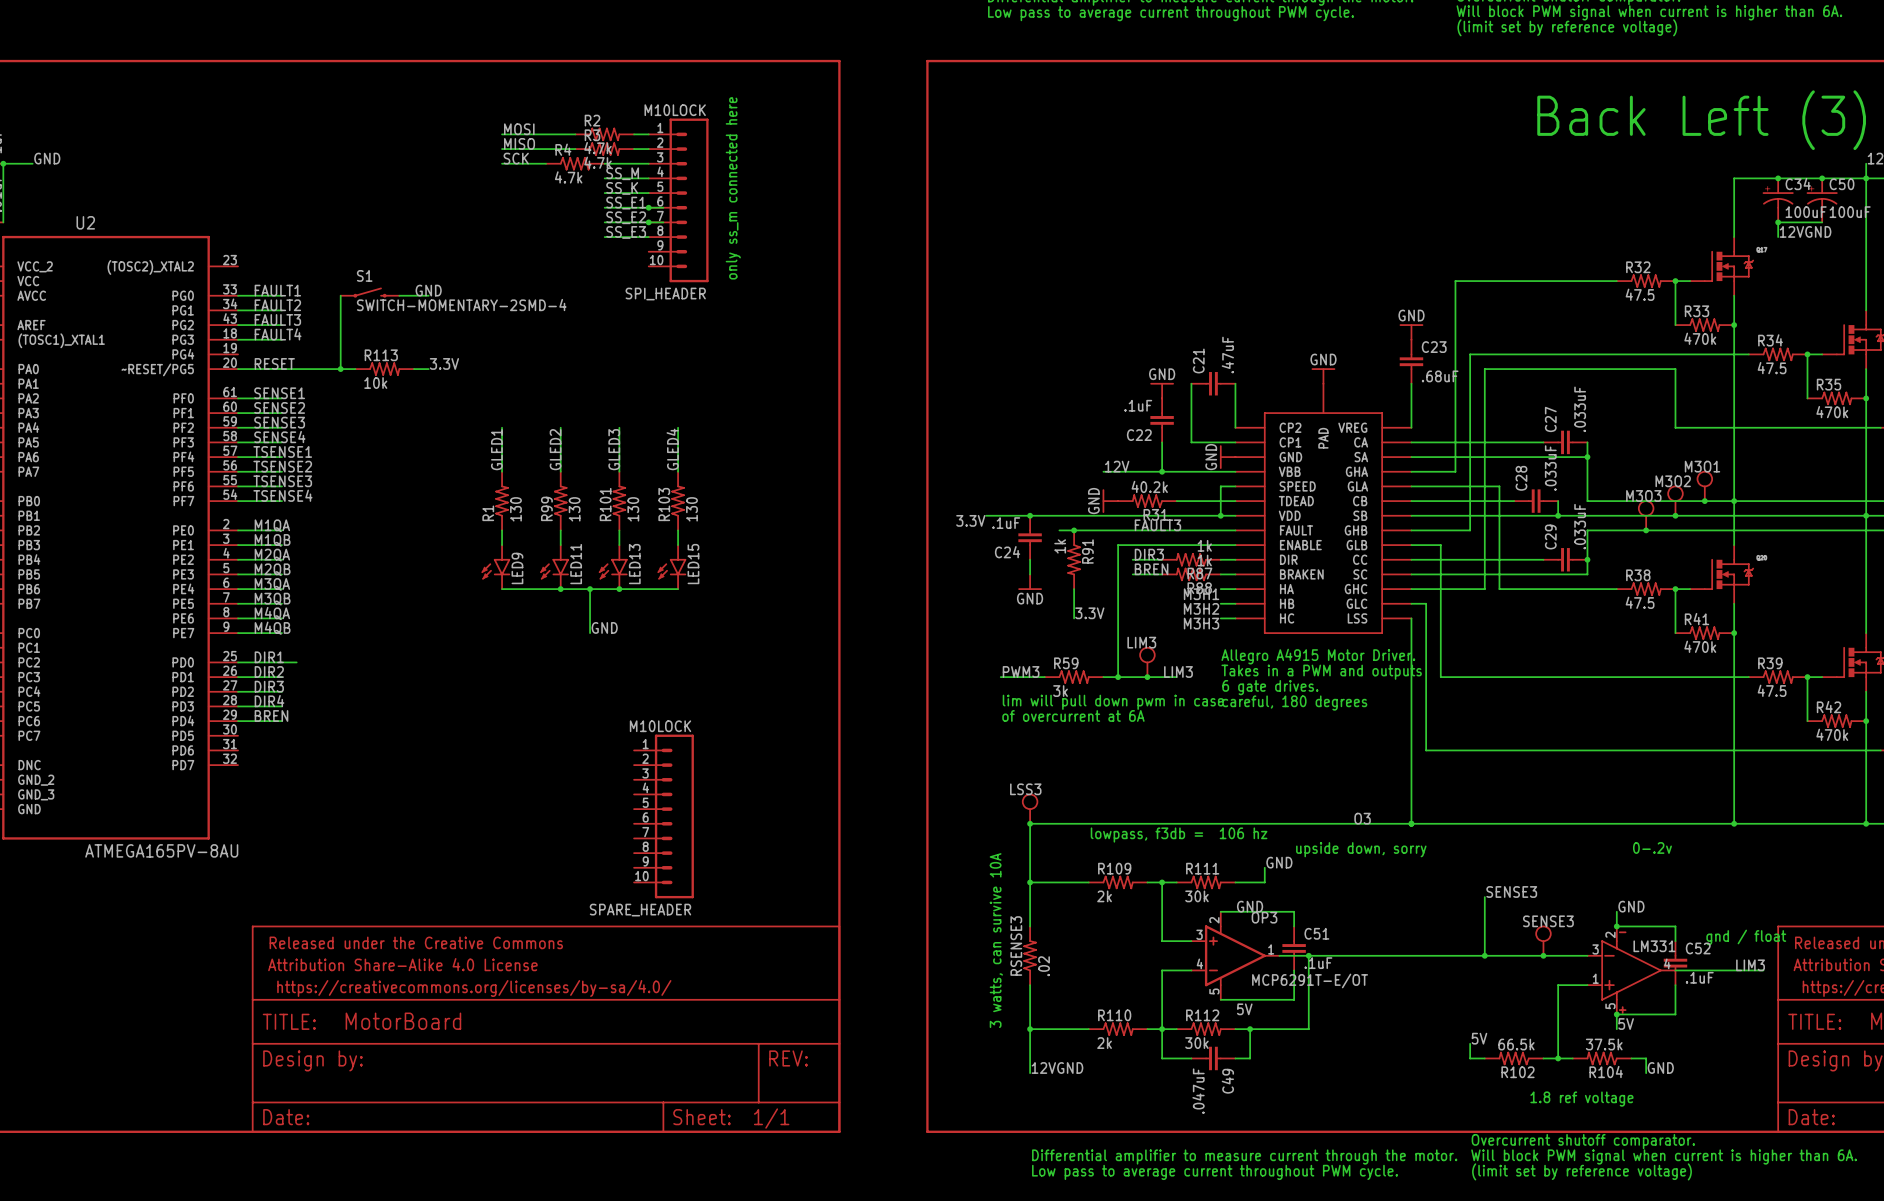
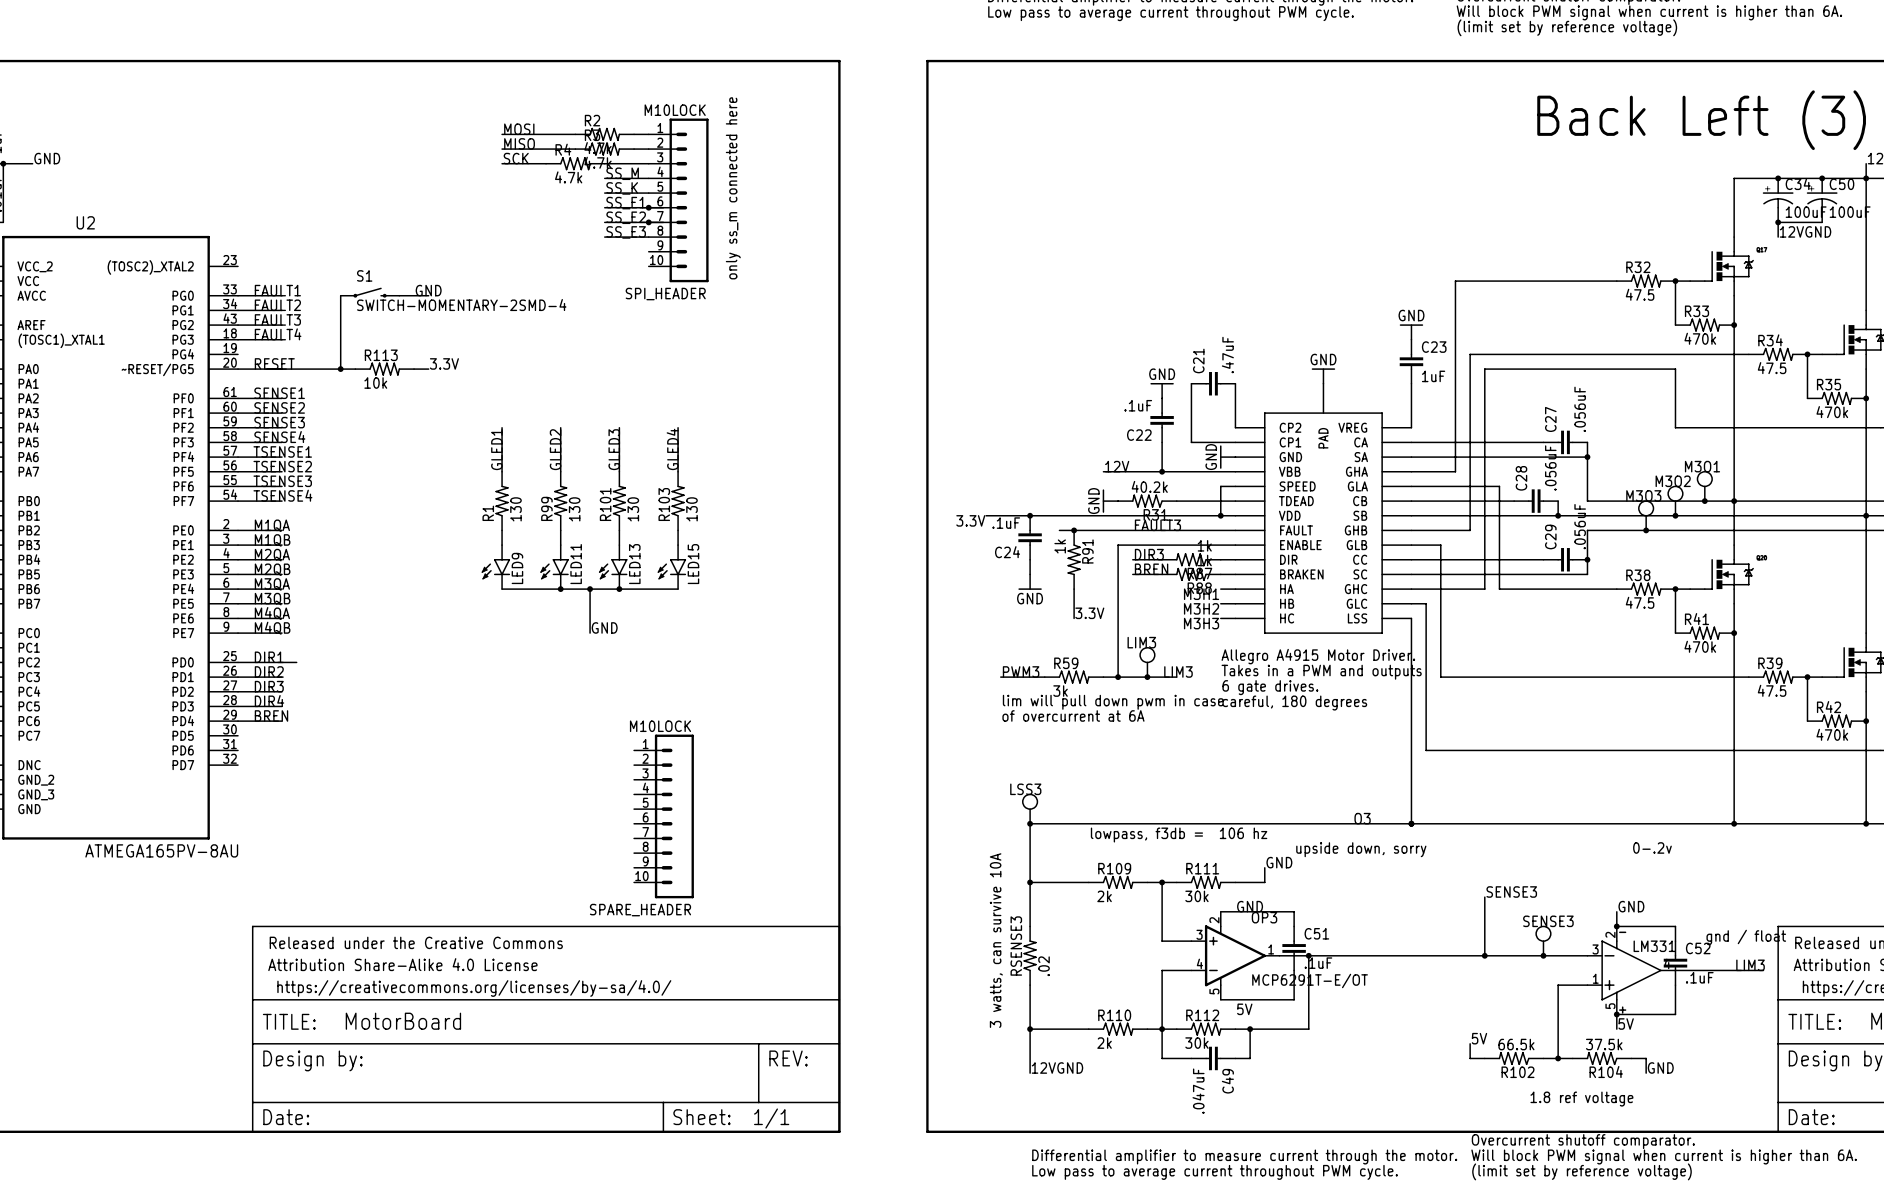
C23 value: .68uF (1440, 376) -> 1uF (1433, 376)
C27 value: .033uF (1580, 409) -> .056uF (1580, 409)
C28 value: .033uF (1550, 467) -> .056uF (1550, 467)
C29 value: .033uF (1580, 526) -> .056uF (1580, 526)

